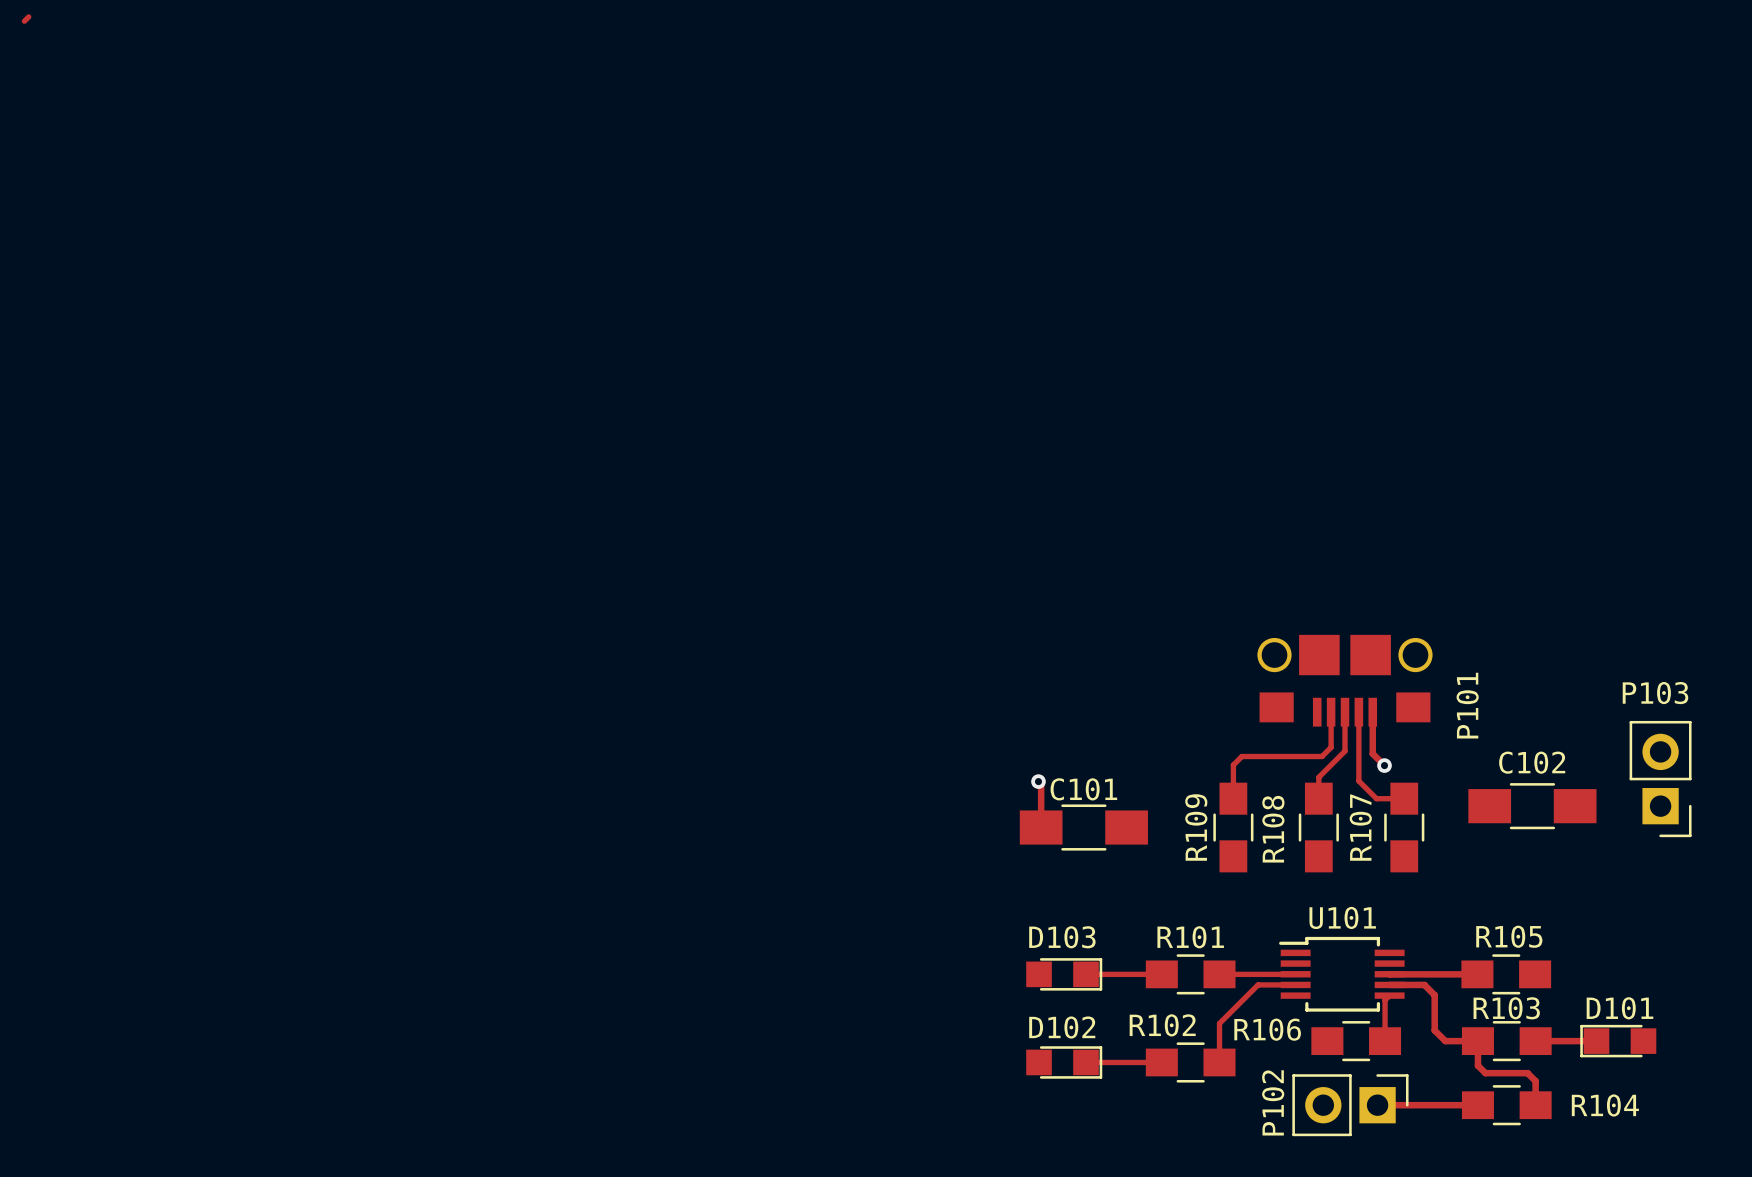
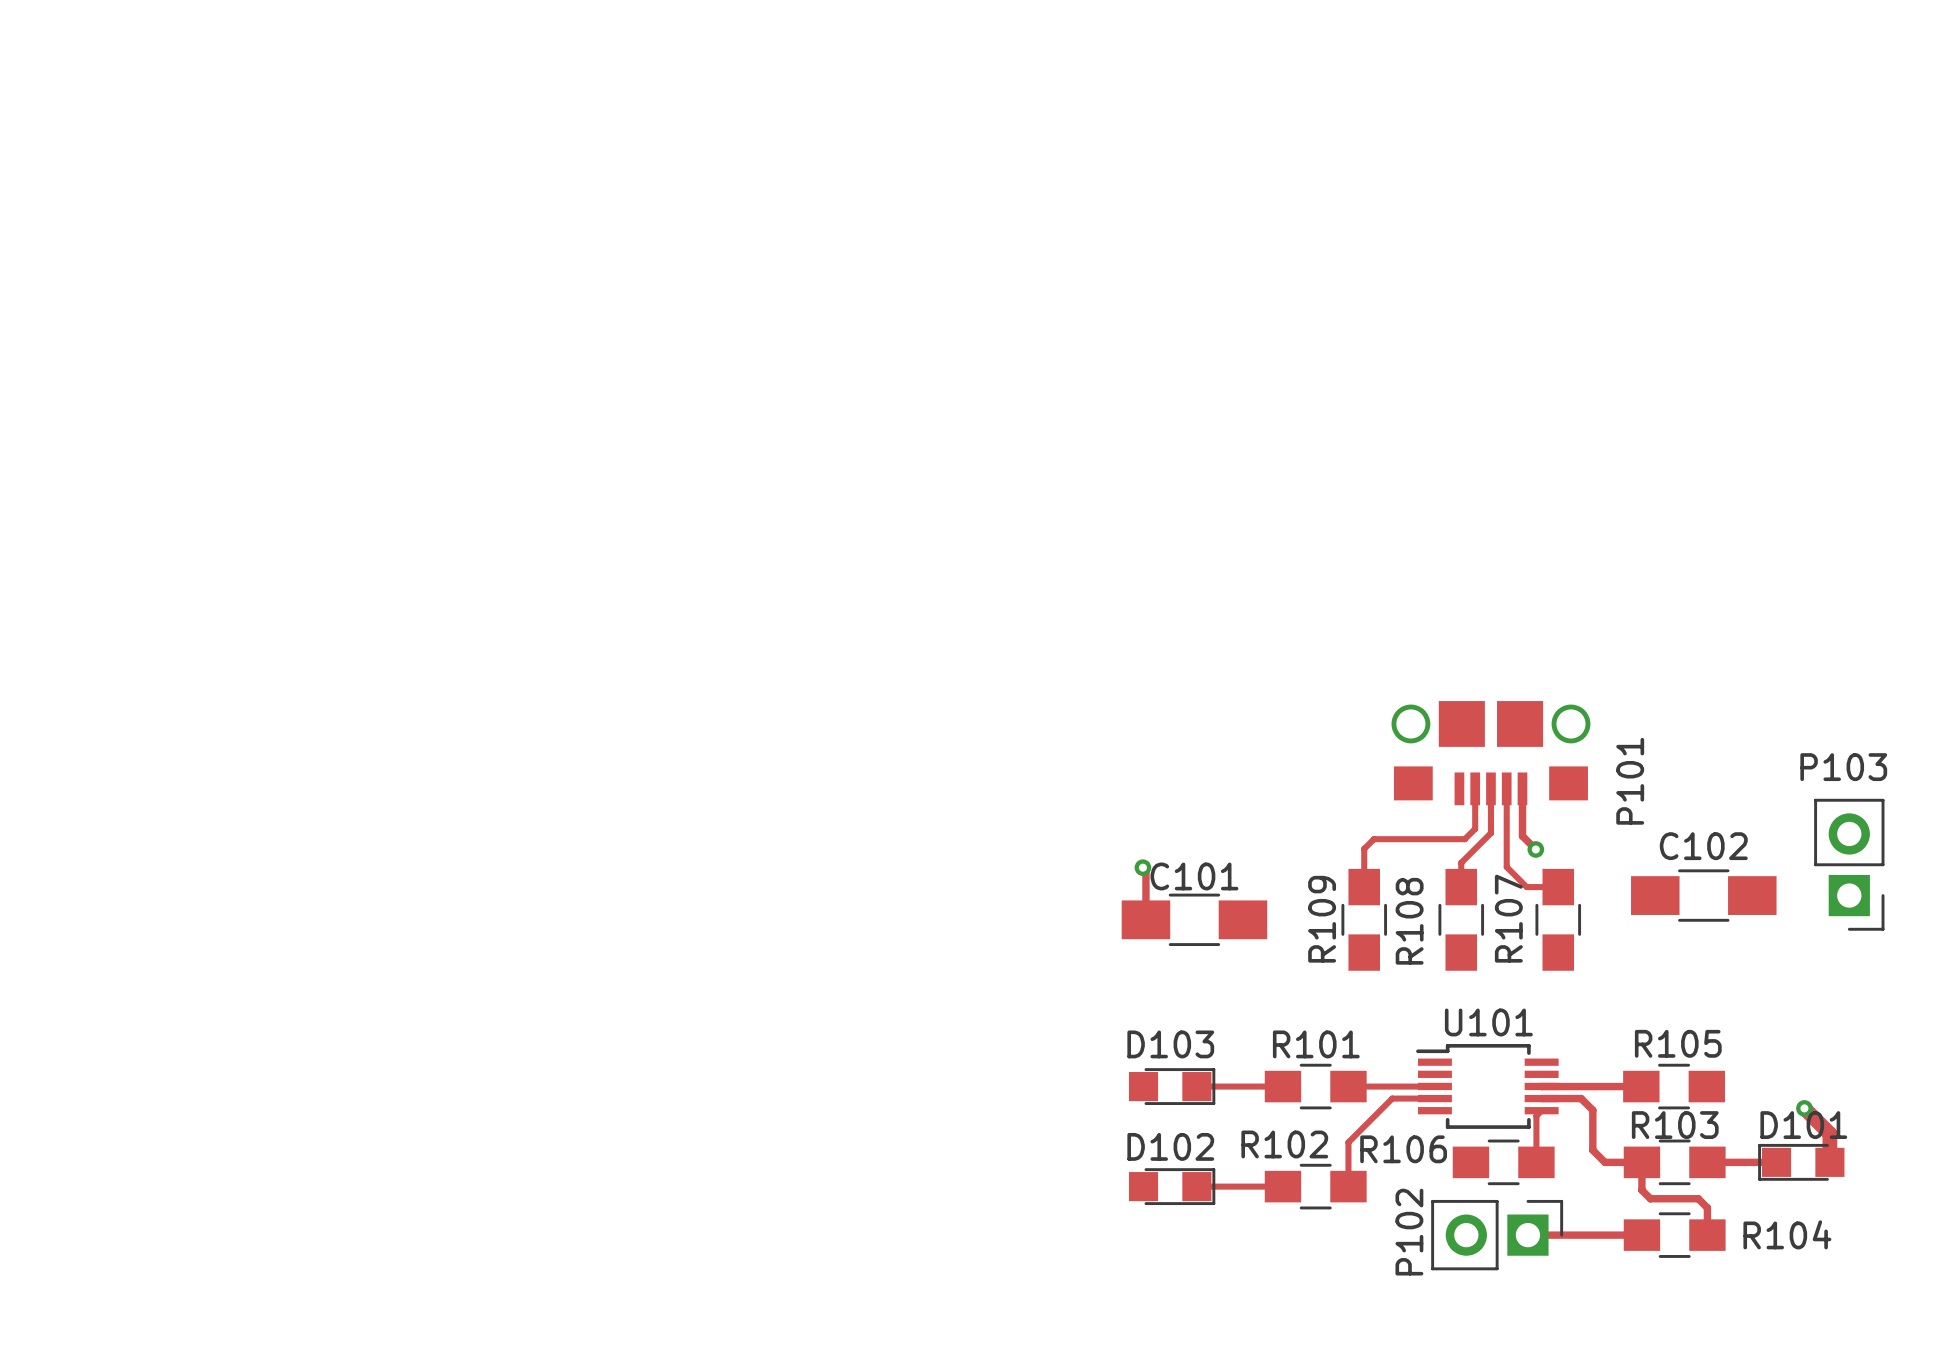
track: none -> (1804, 1108) (1829, 1133) (1829, 1162)
via: none -> (1804, 1108)

